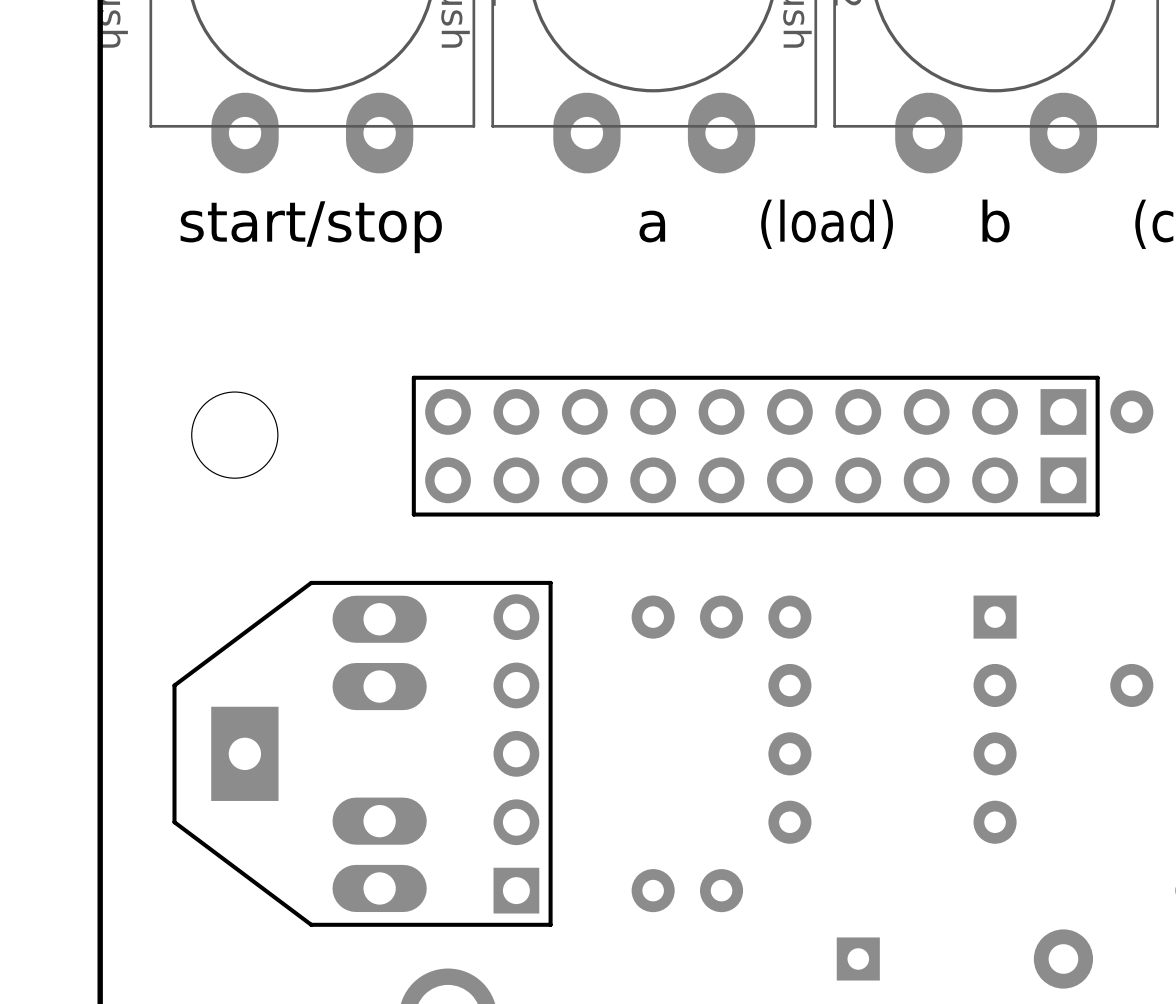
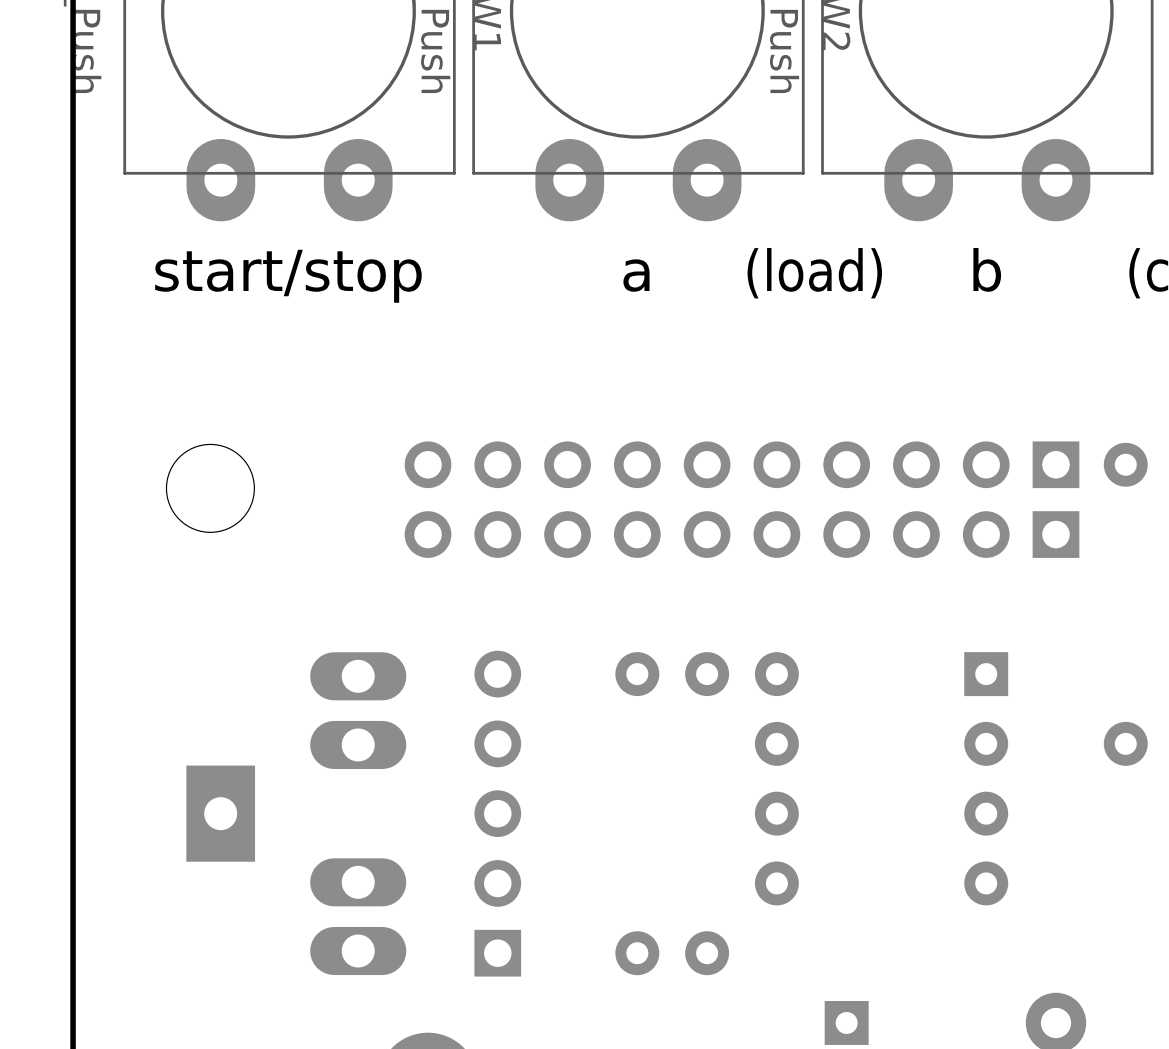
line: (1097, 377) (413, 377) (413, 514) (1097, 514) (1097, 377) -> none
line: (550, 582) (550, 924) (311, 924) (174, 822) (174, 685) (311, 582) (550, 582) -> none

